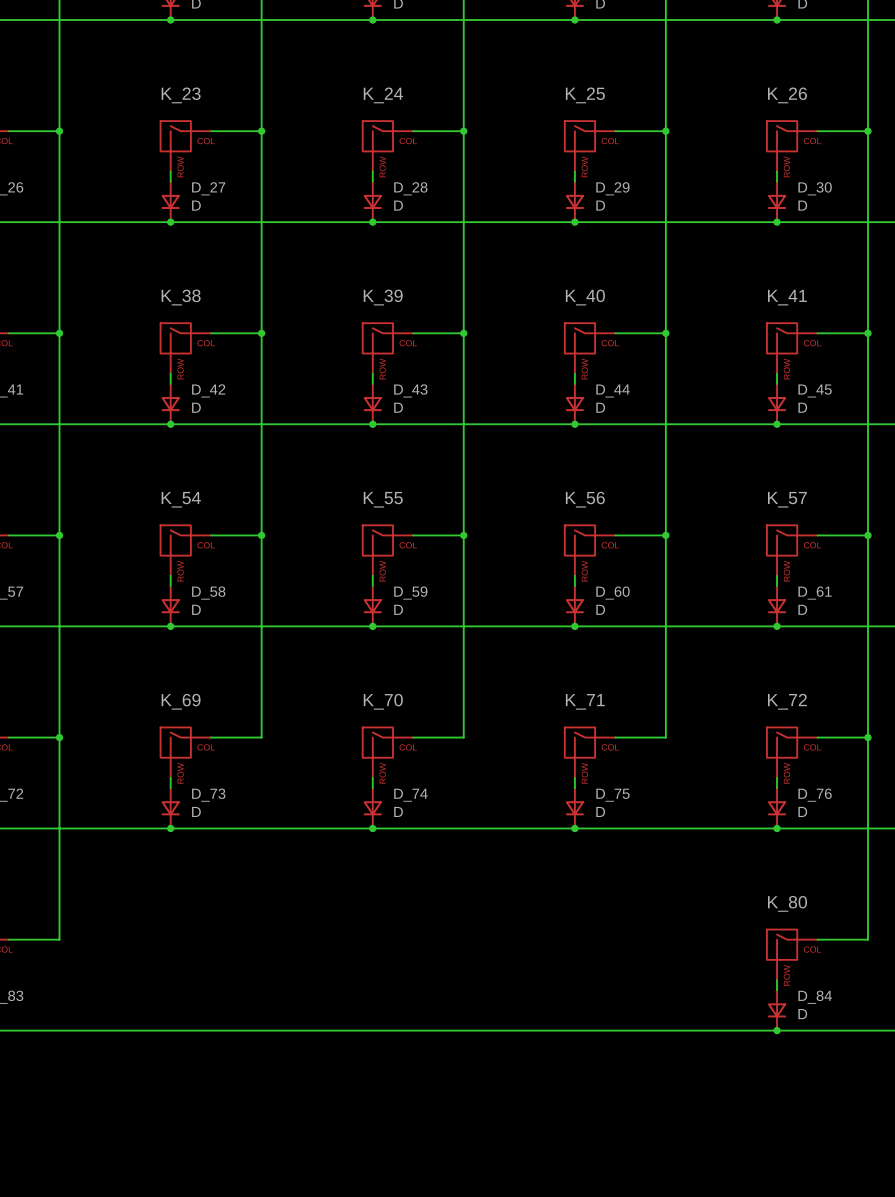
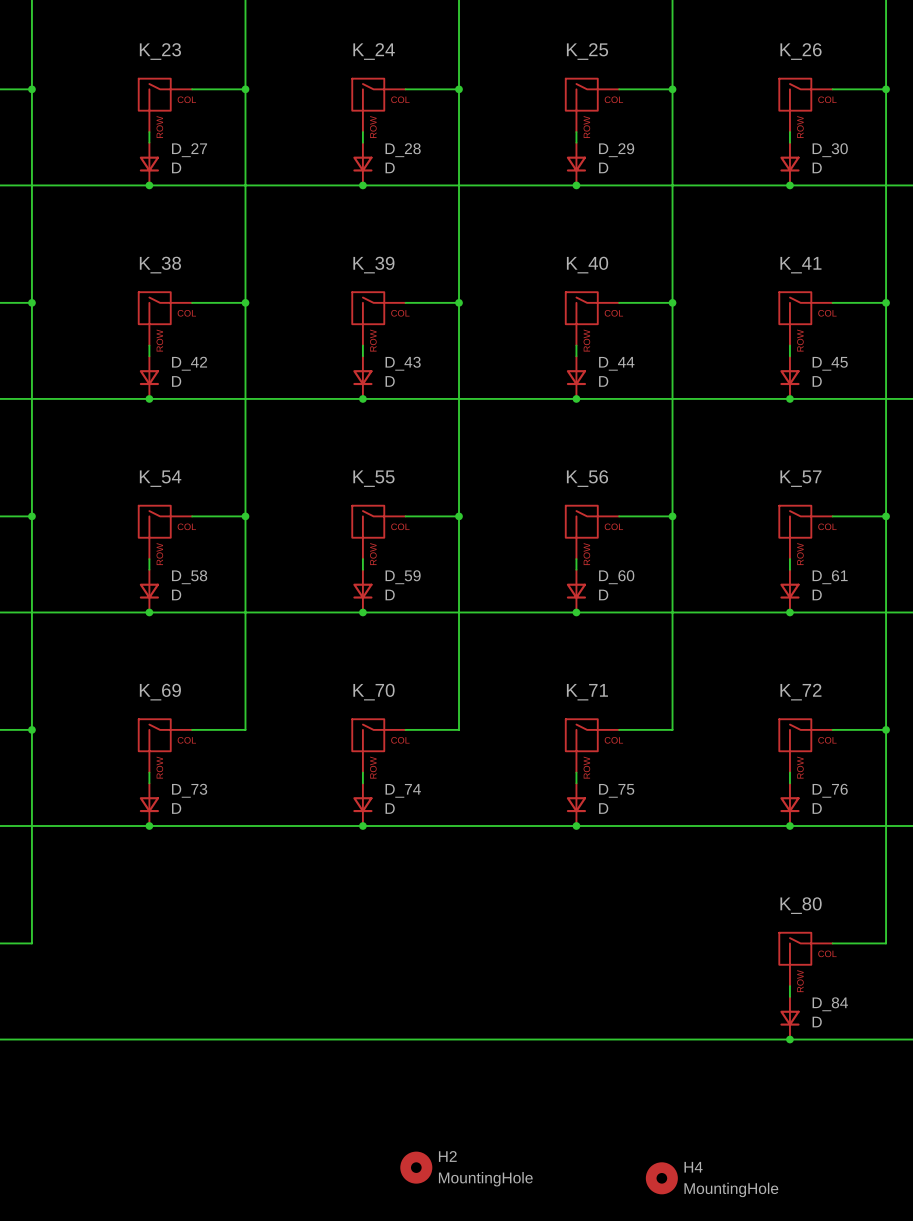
H2: none -> MountingHole (416, 1167)
H4: none -> MountingHole (661, 1178)

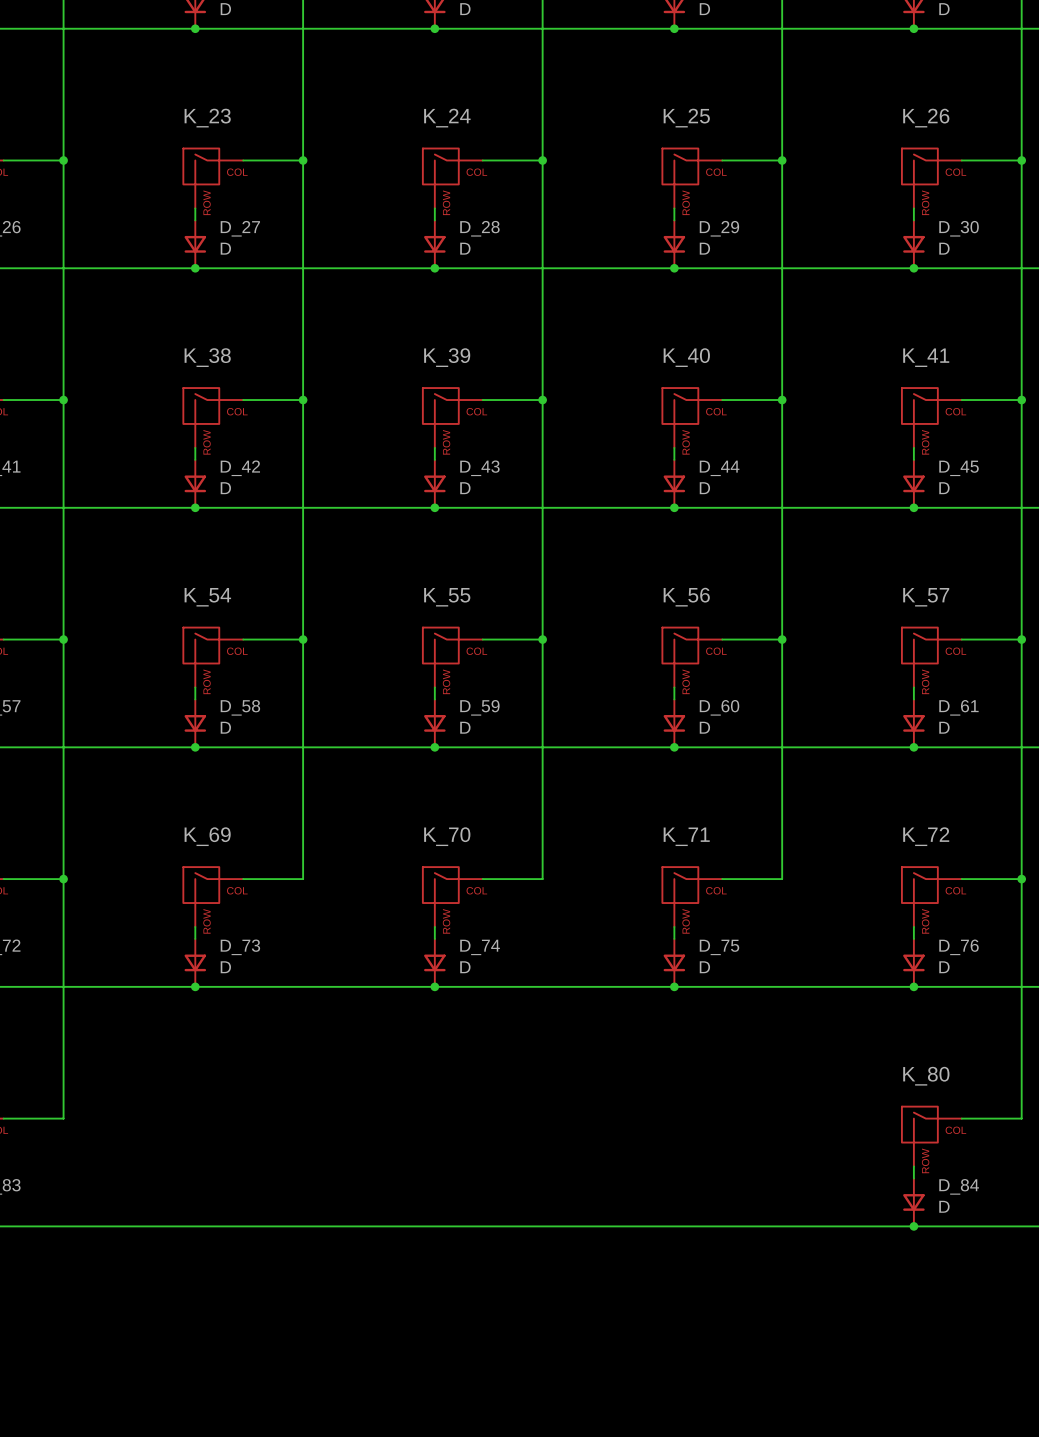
H2: MountingHole (416, 1167) -> none
H4: MountingHole (661, 1178) -> none

